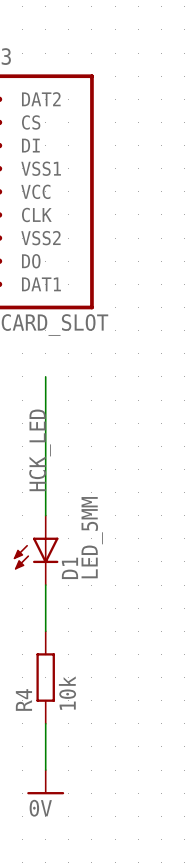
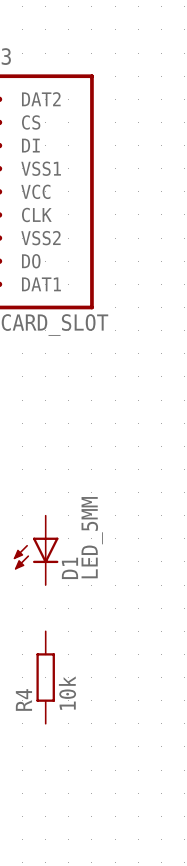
wire: (45, 376) (45, 515) -> none
label: HCK_LED (40, 450) -> none
wire: (45, 585) (45, 631) -> none
wire: (45, 723) (45, 770) -> none
power symbol: 0V (45, 782) -> none

